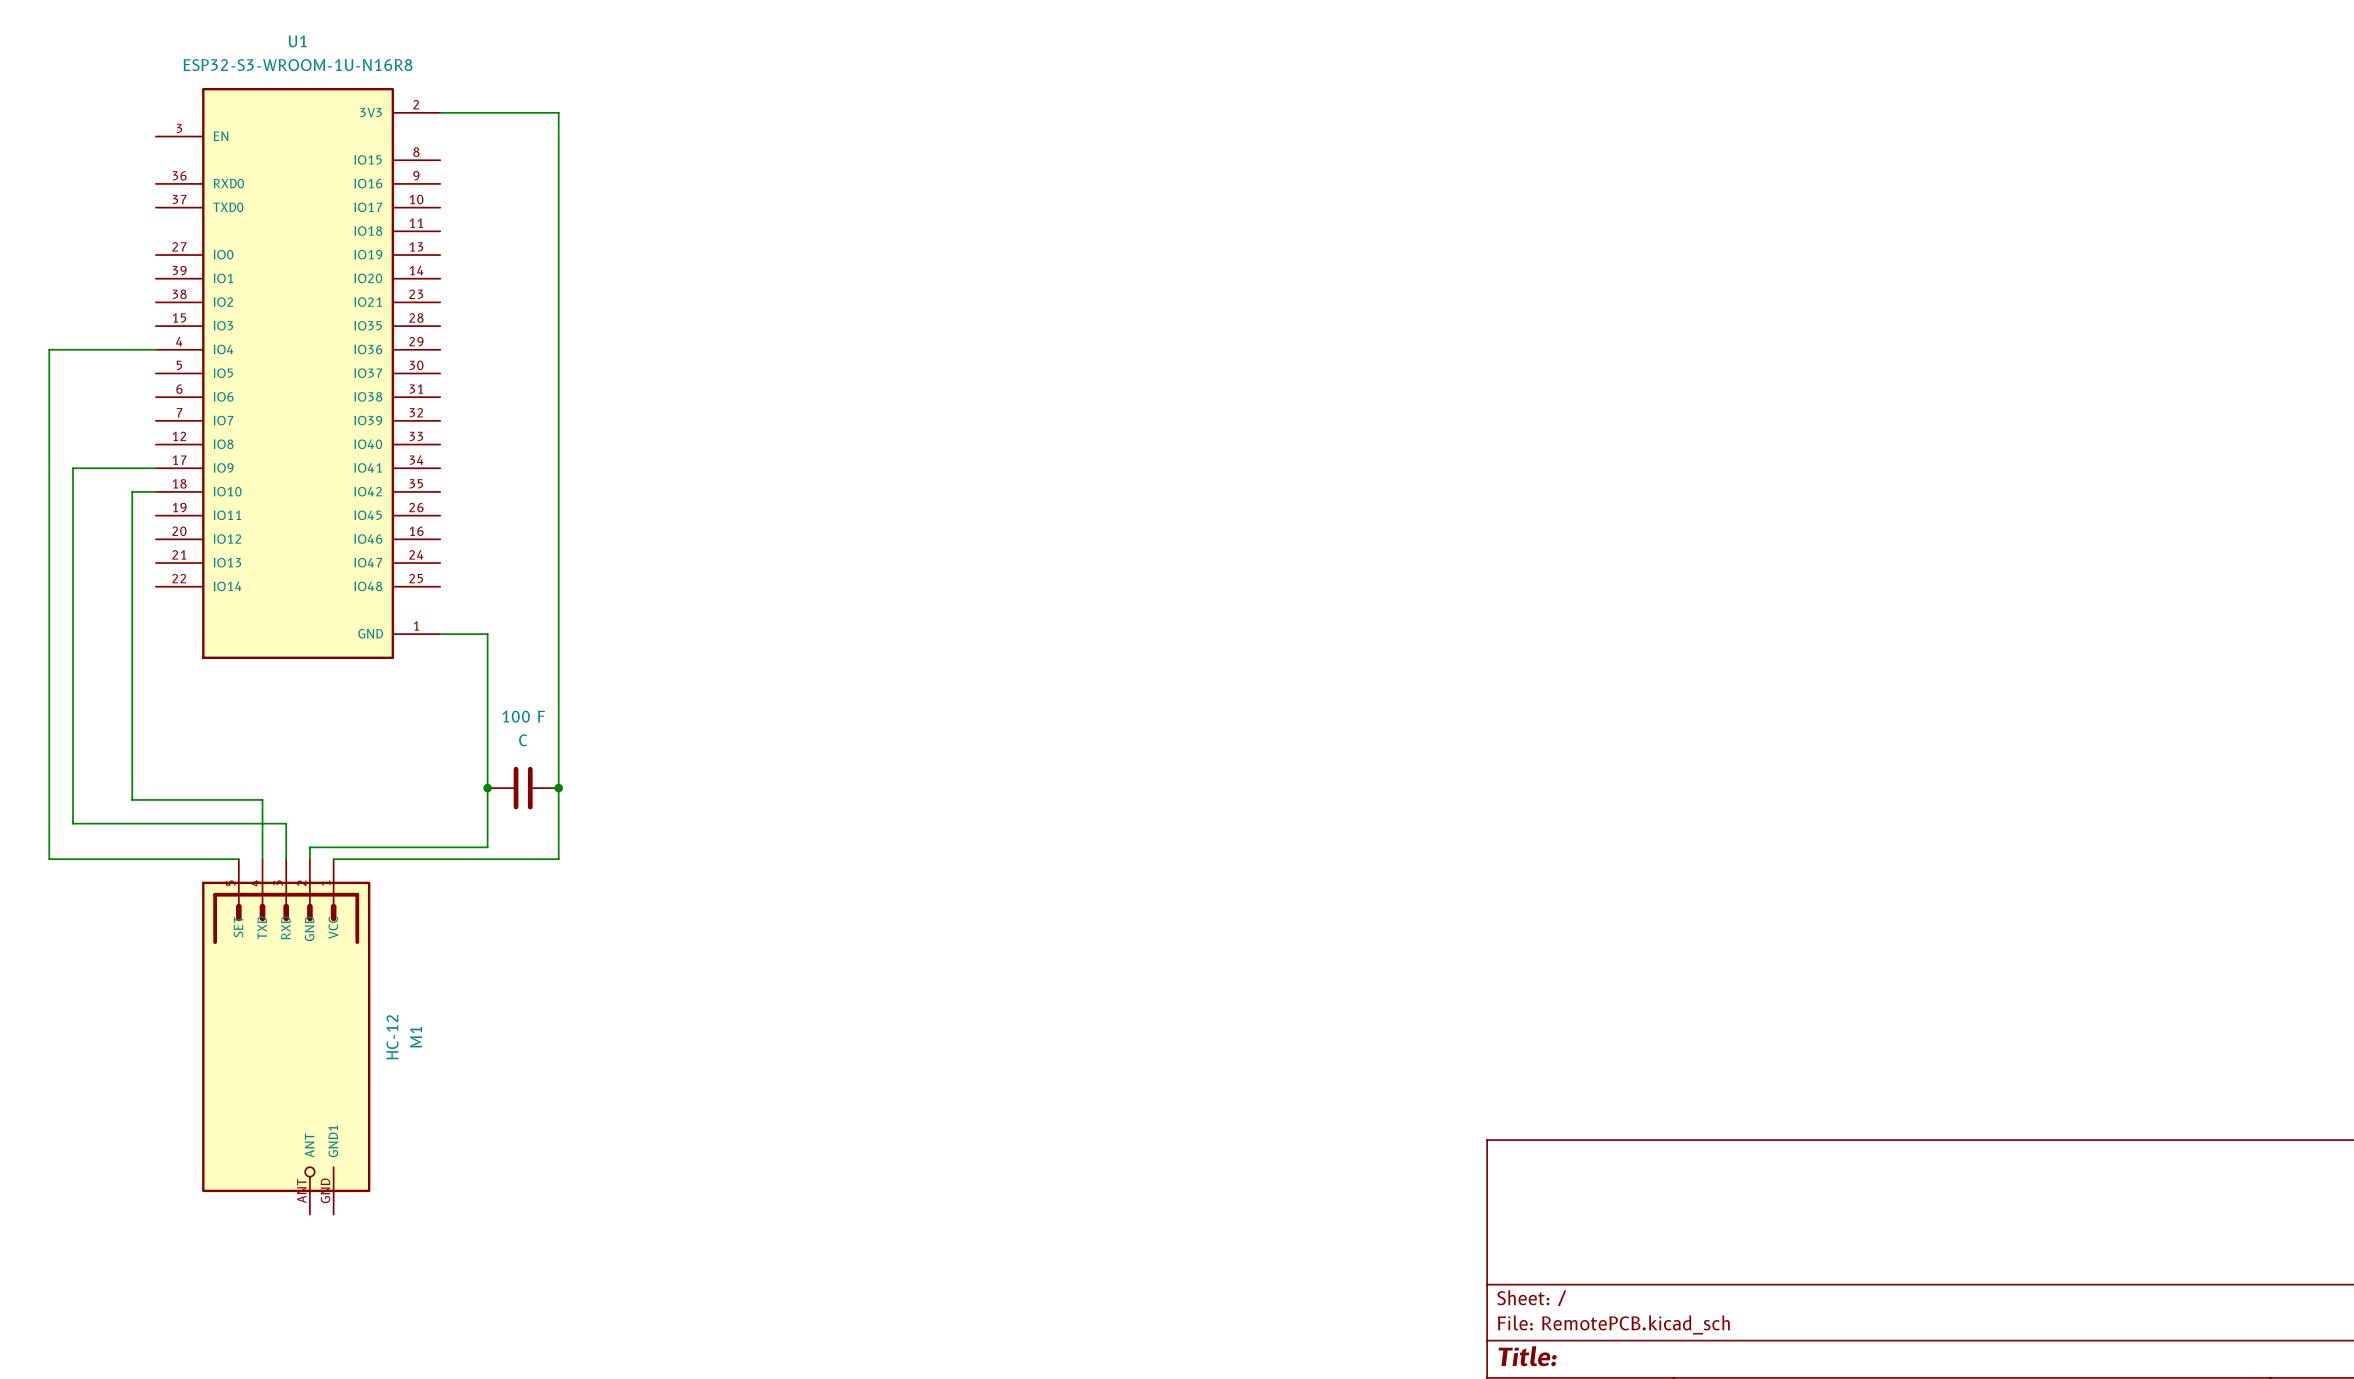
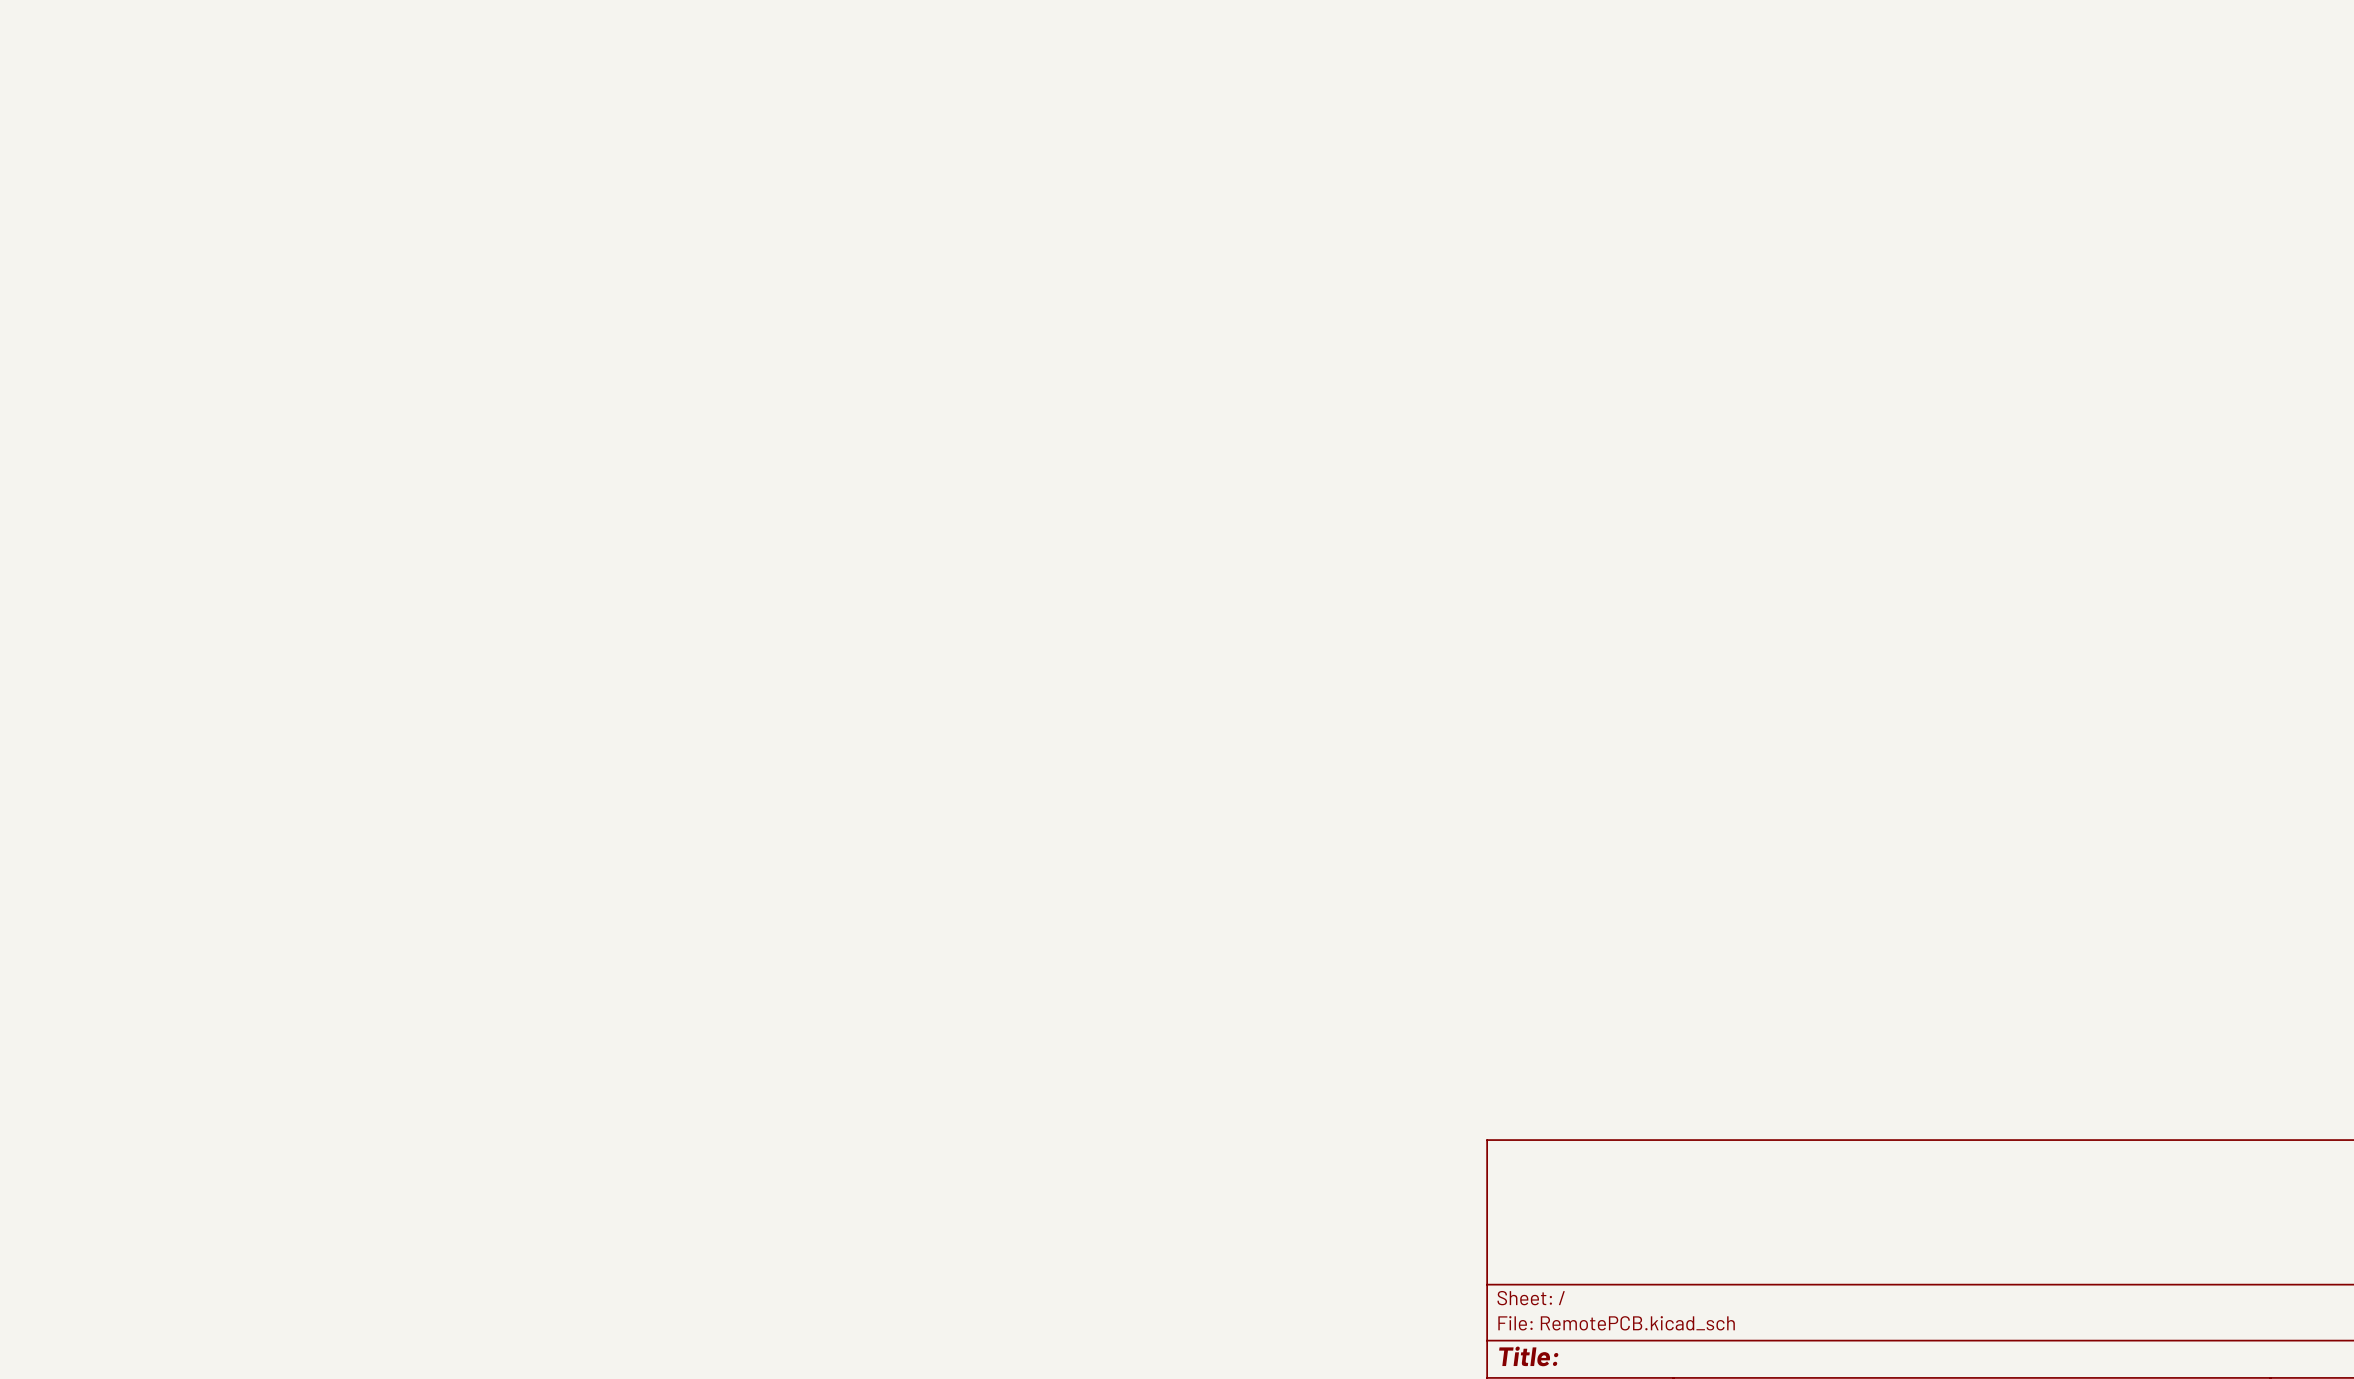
wire: (440, 112) (558, 112) (558, 859) (333, 859) -> none
wire: (155, 349) (49, 349) (49, 859) (238, 859) -> none
U1: ESP32-S3-WROOM-1U-N16R8 (298, 373) -> none
wire: (155, 468) (72, 468) (72, 823) (286, 823) (286, 859) -> none
wire: (155, 491) (132, 491) (132, 799) (262, 799) (262, 859) -> none
wire: (440, 634) (487, 634) (487, 847) (309, 847) (309, 859) -> none
junction: (487, 788) -> none
100 F: C (523, 788) -> none
junction: (558, 788) -> none
M1: HC-12 (286, 1036) -> none

